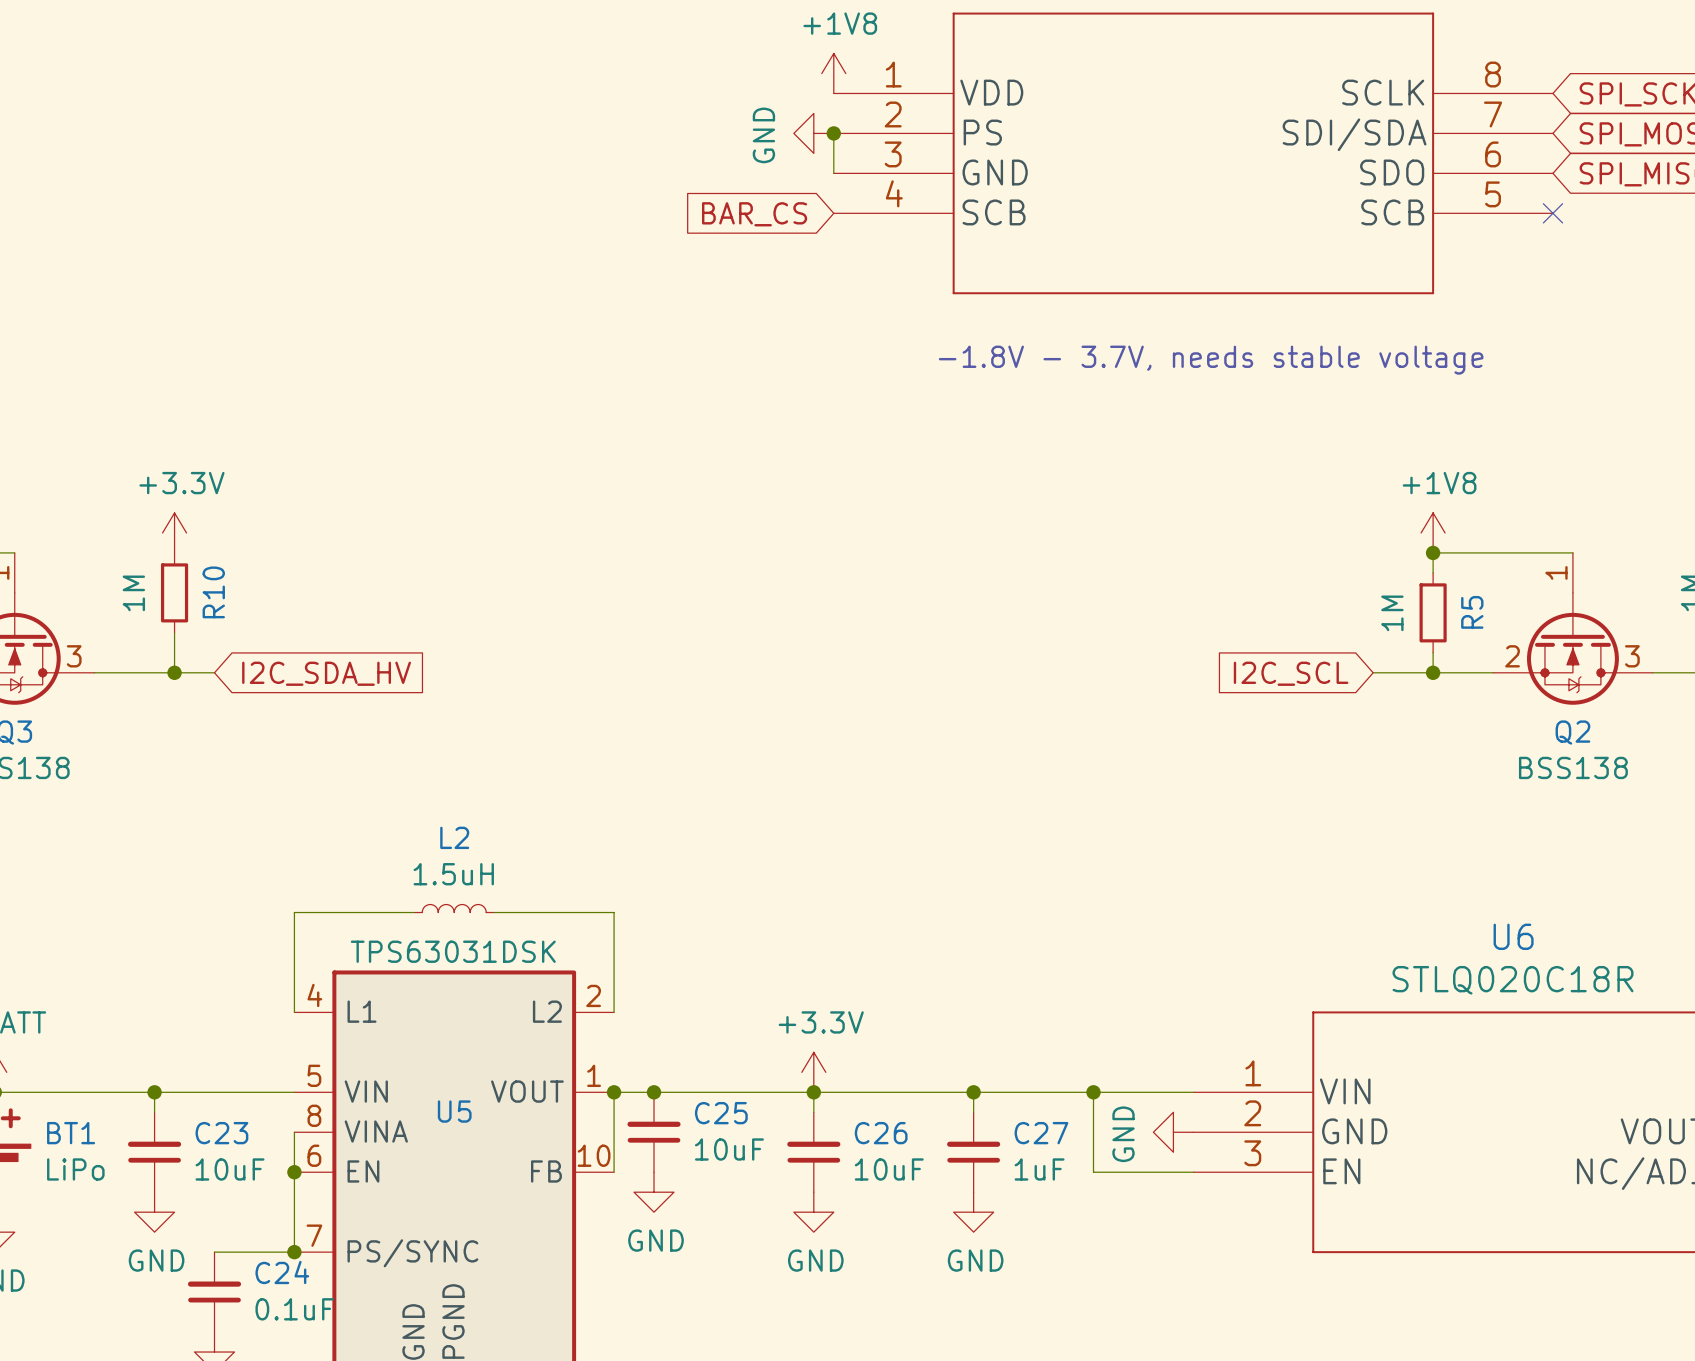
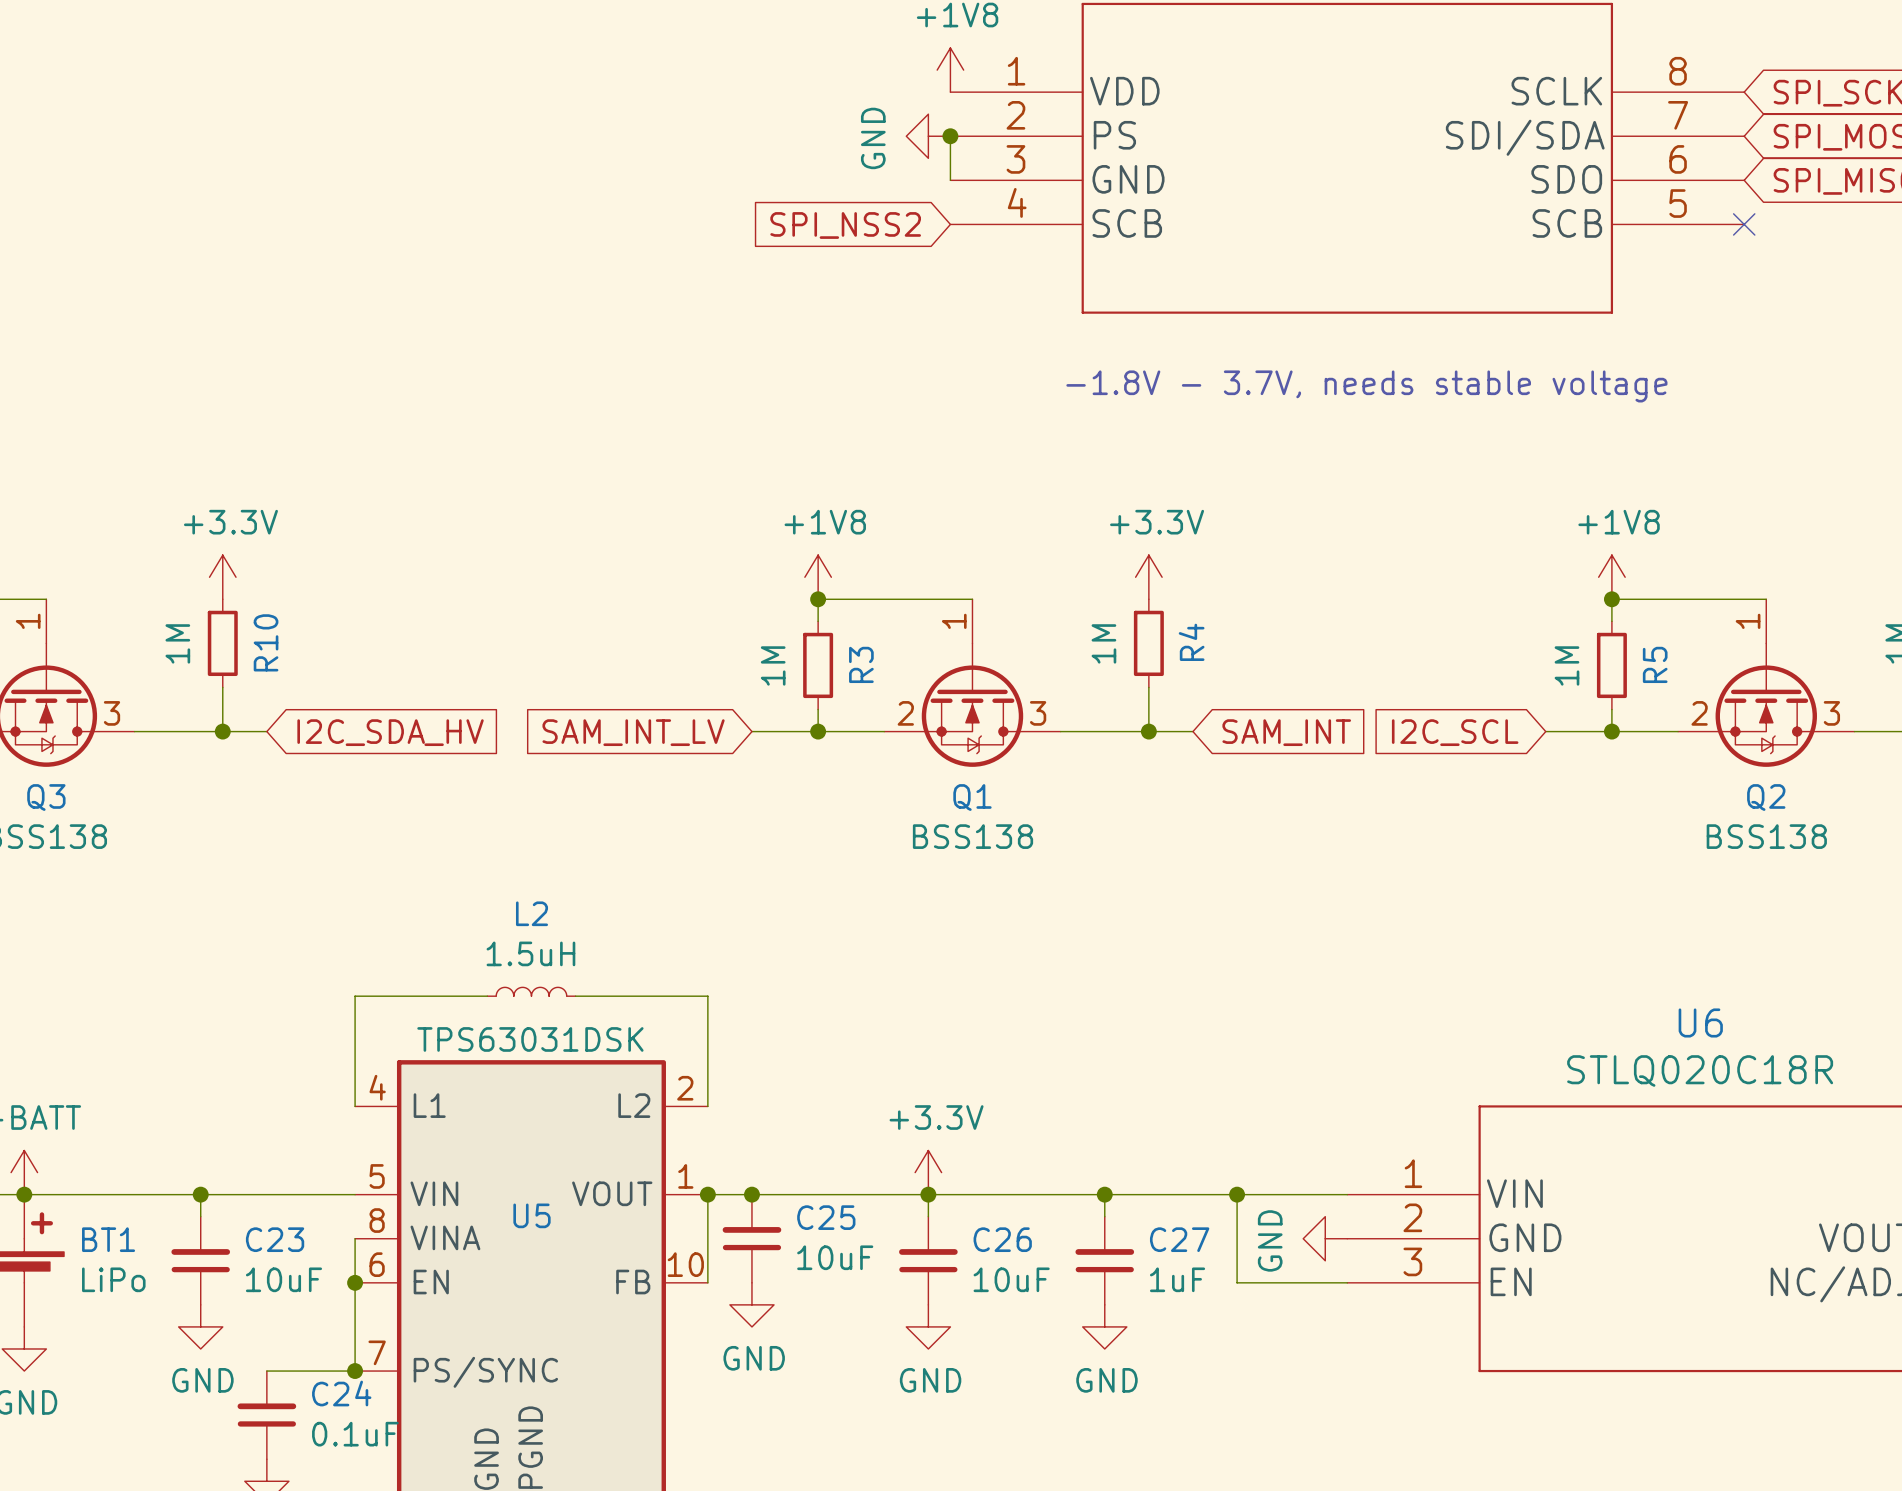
global label: BAR_CS (754, 214) -> SPI_NSS2 (845, 225)
power symbol: none -> +1V8 (818, 577)
power symbol: none -> +3.3V (1148, 577)
junction: none -> (818, 599)
wire: none -> (972, 599) (818, 599) (818, 621)
R4: none -> 1M (1148, 643)
R3: none -> 1M (818, 665)
Q1: none -> BSS138 (972, 683)
wire: none -> (1148, 687) (1148, 731)
wire: none -> (818, 709) (818, 731)
wire: none -> (751, 731) (884, 731)
junction: none -> (818, 731)
wire: none -> (1060, 731) (1192, 731)
junction: none -> (1148, 731)
global label: none -> SAM_INT_LV (633, 732)
global label: none -> SAM_INT (1286, 732)

